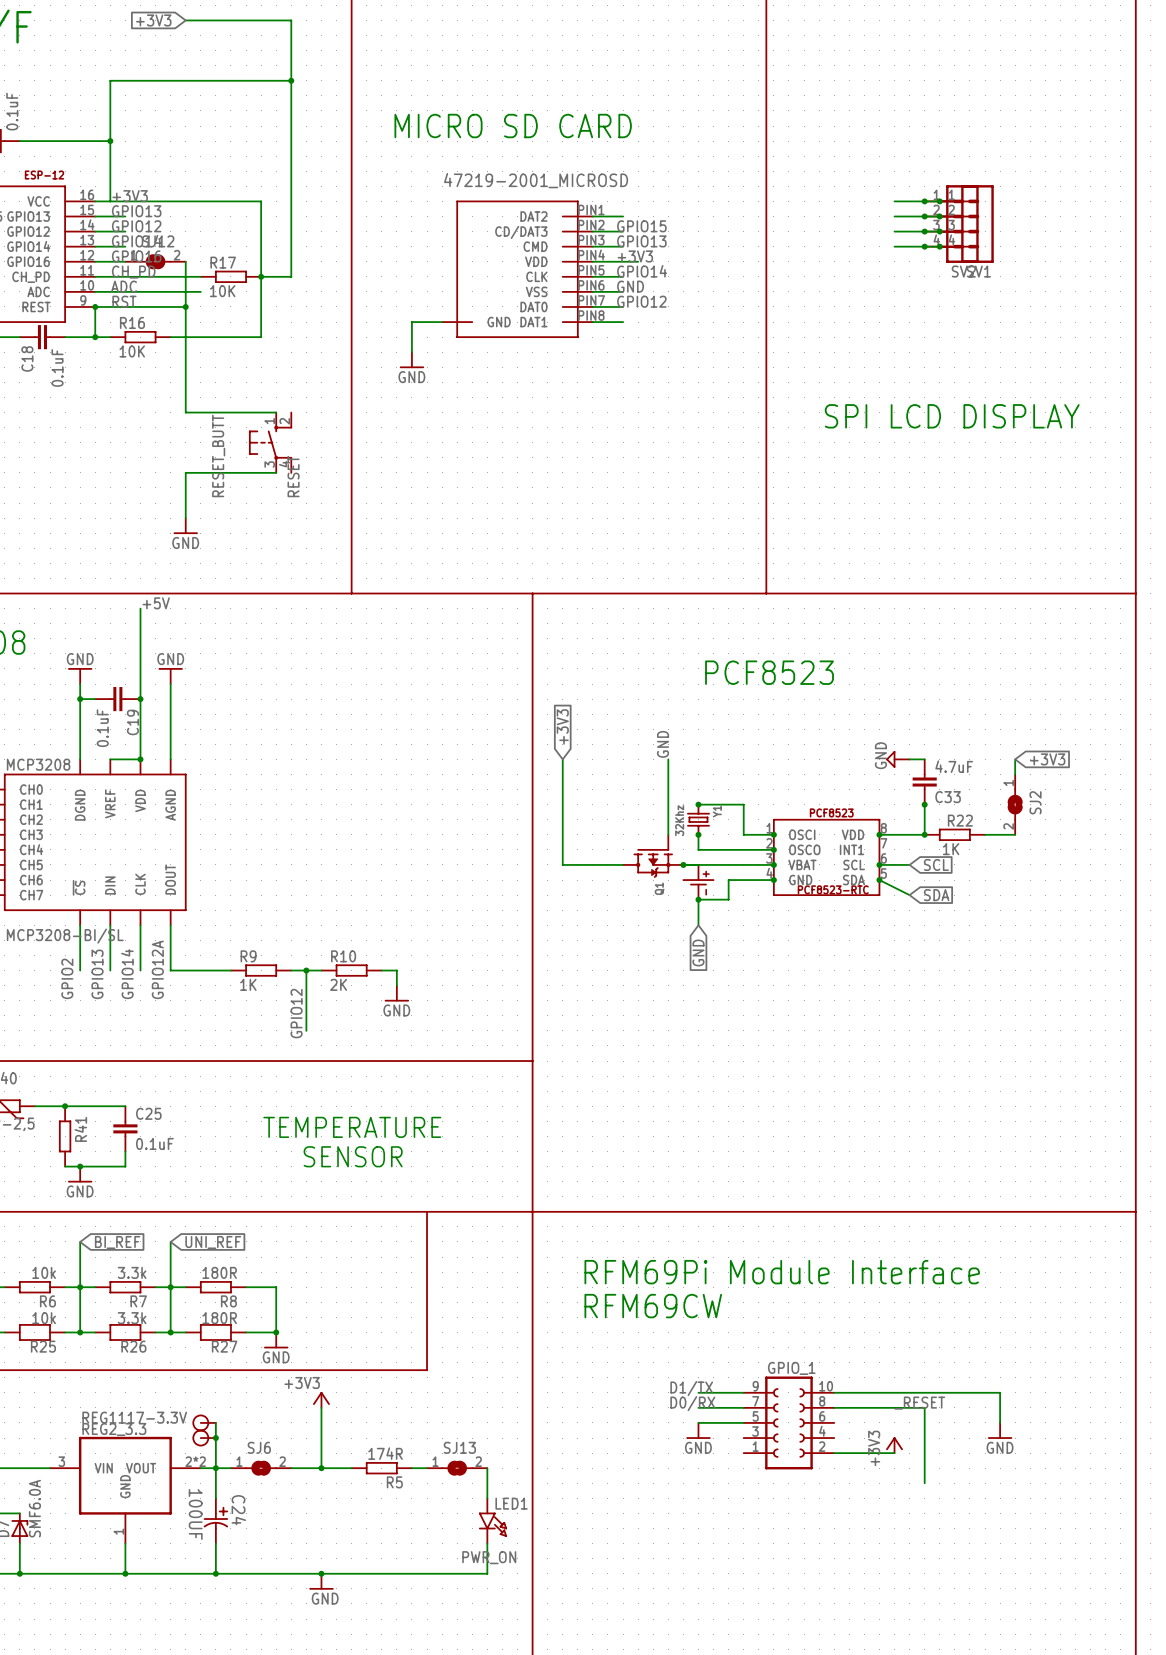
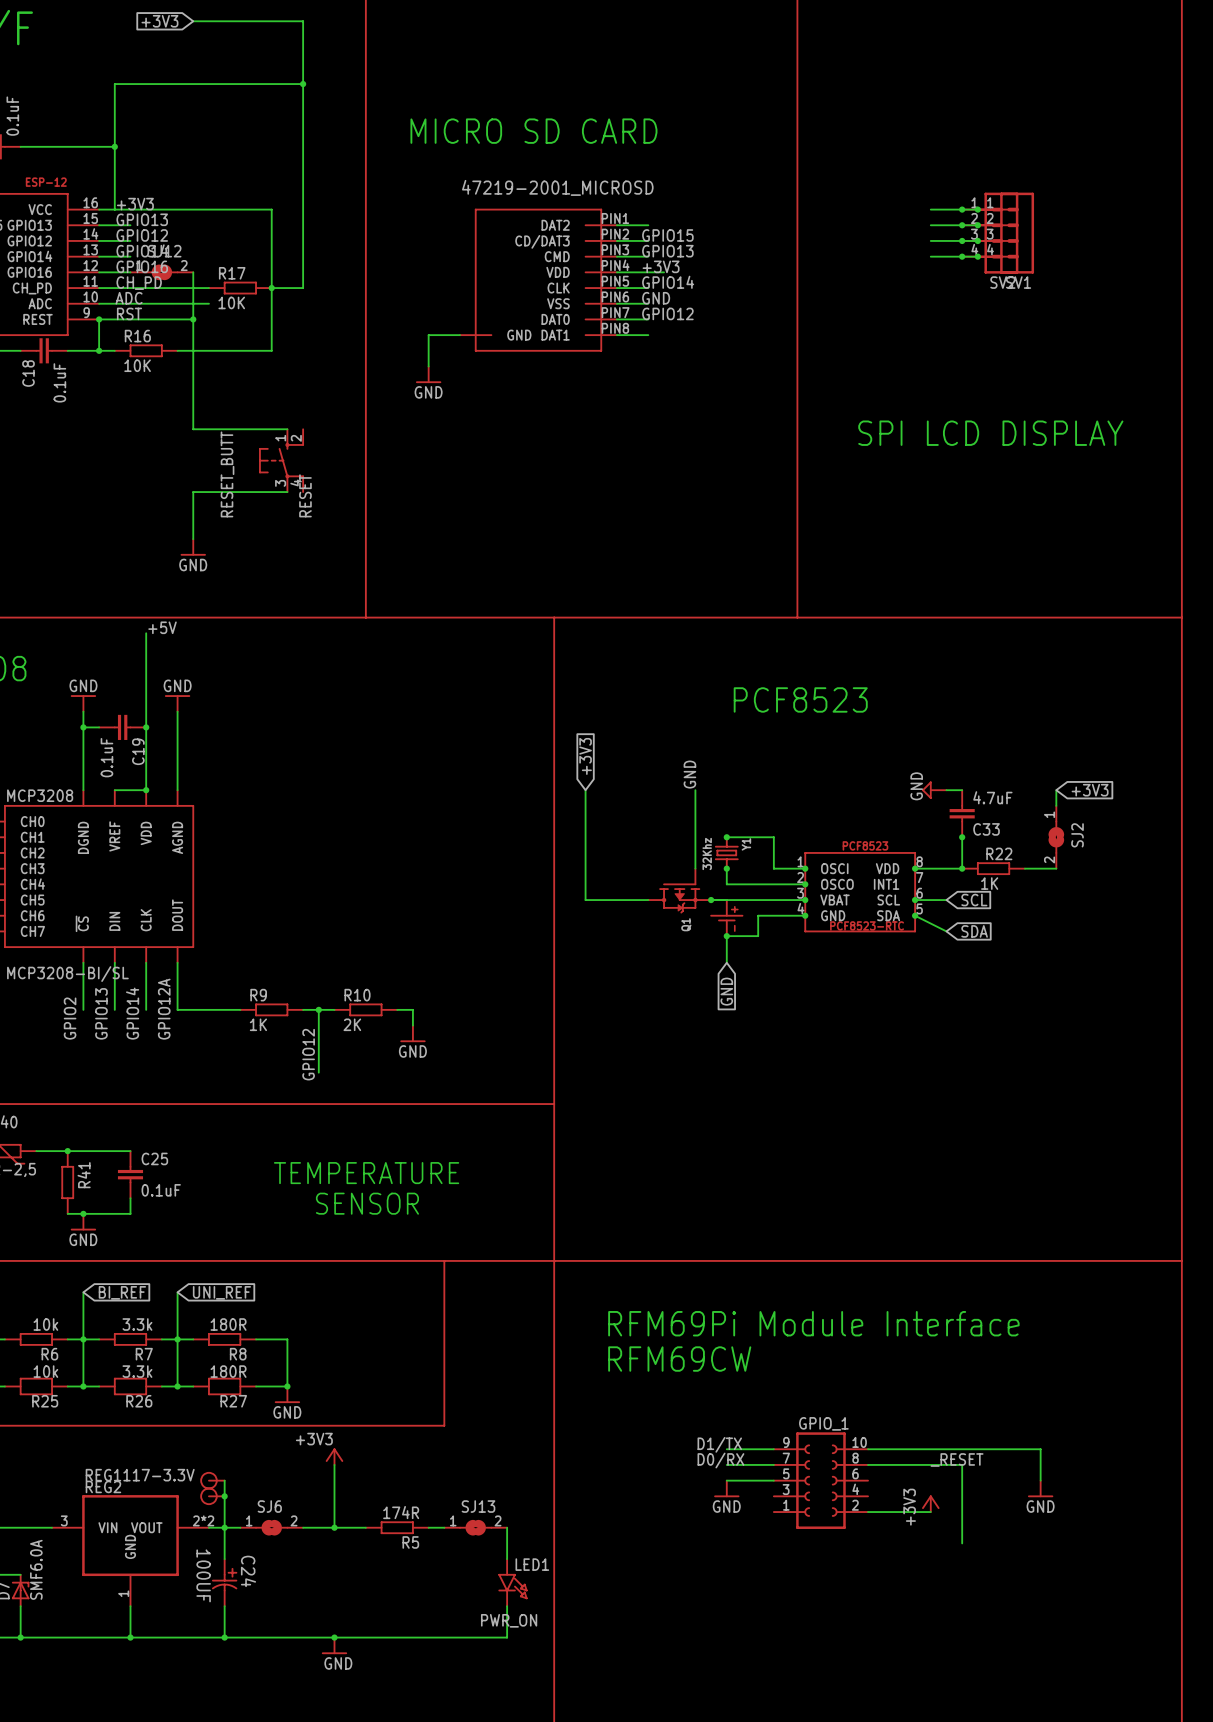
REG2_3.3 name: REG2_3.3 (114, 1429) -> REG2 (103, 1486)

